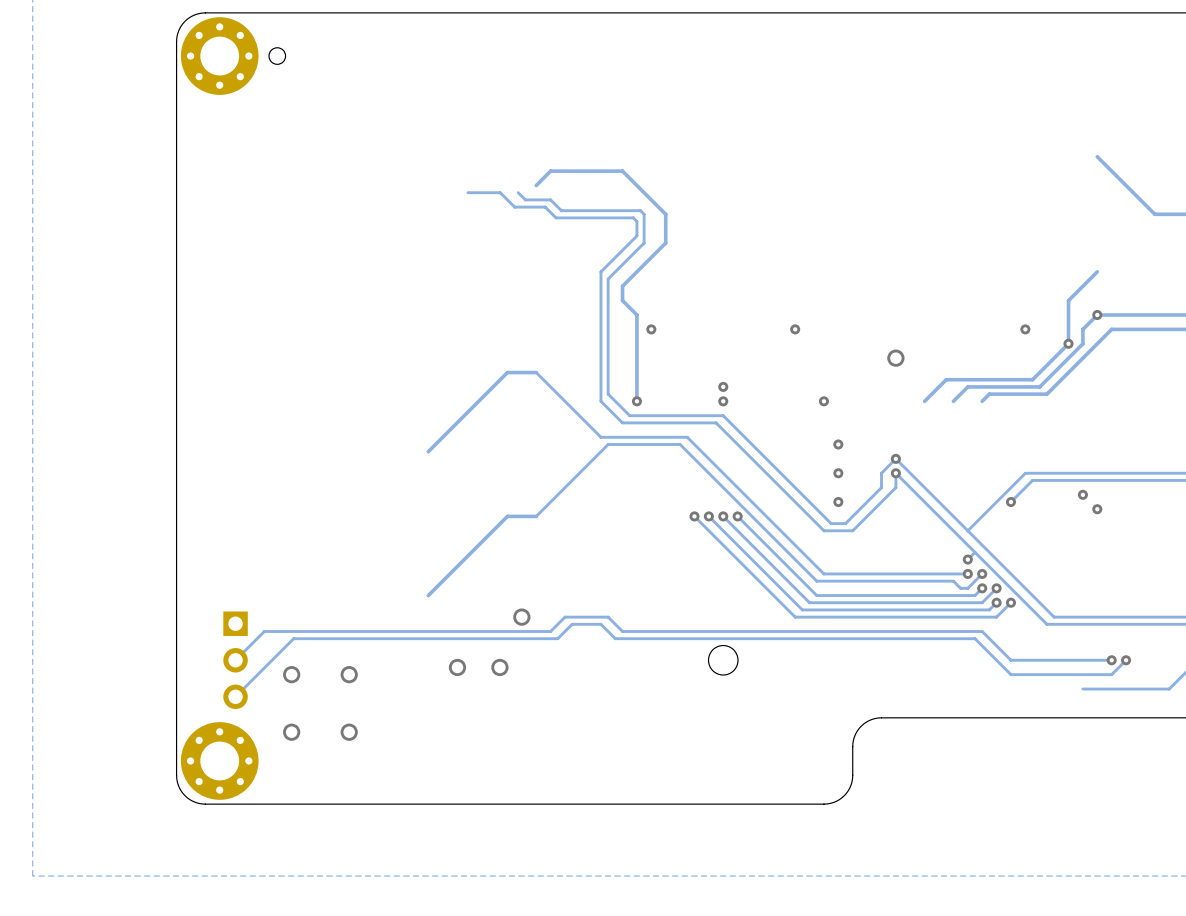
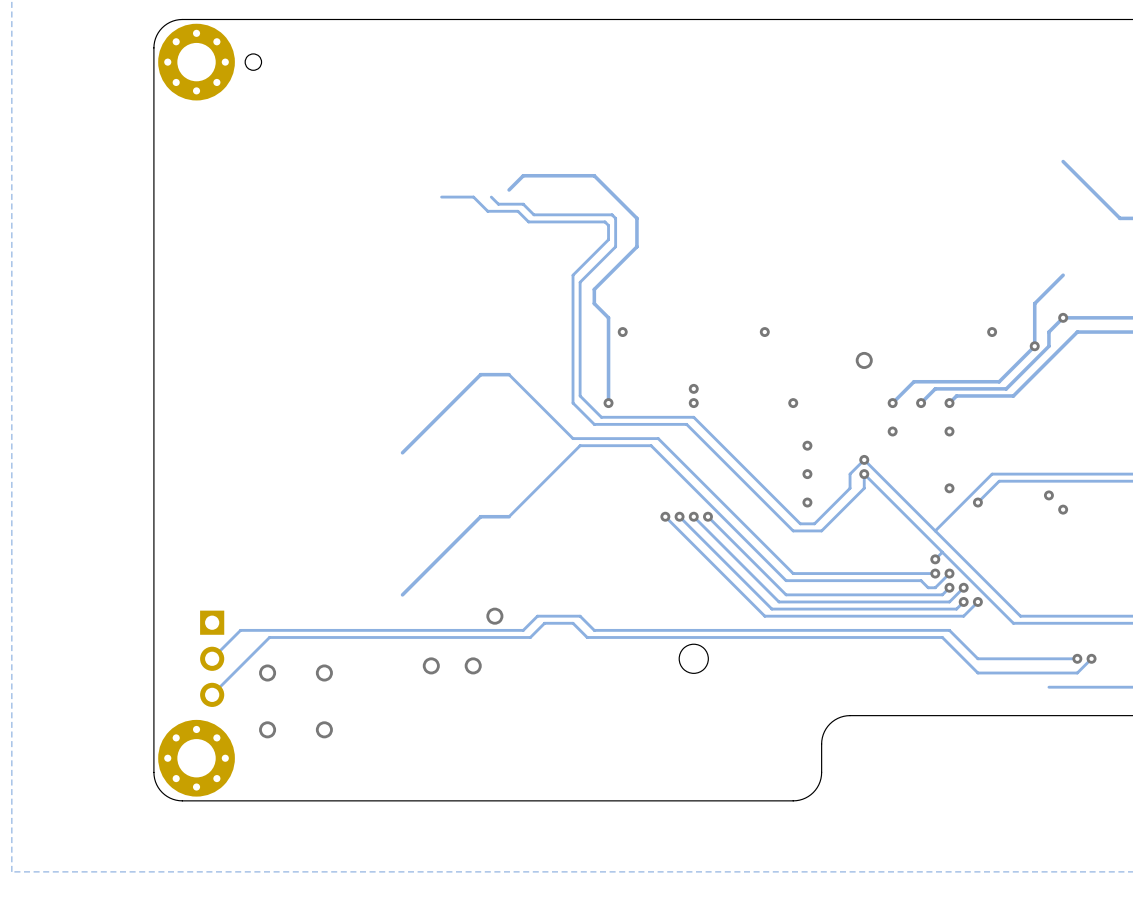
via: none -> (892, 403)
via: none -> (921, 403)
via: none -> (949, 403)
via: none -> (892, 431)
via: none -> (949, 431)
via: none -> (949, 488)

